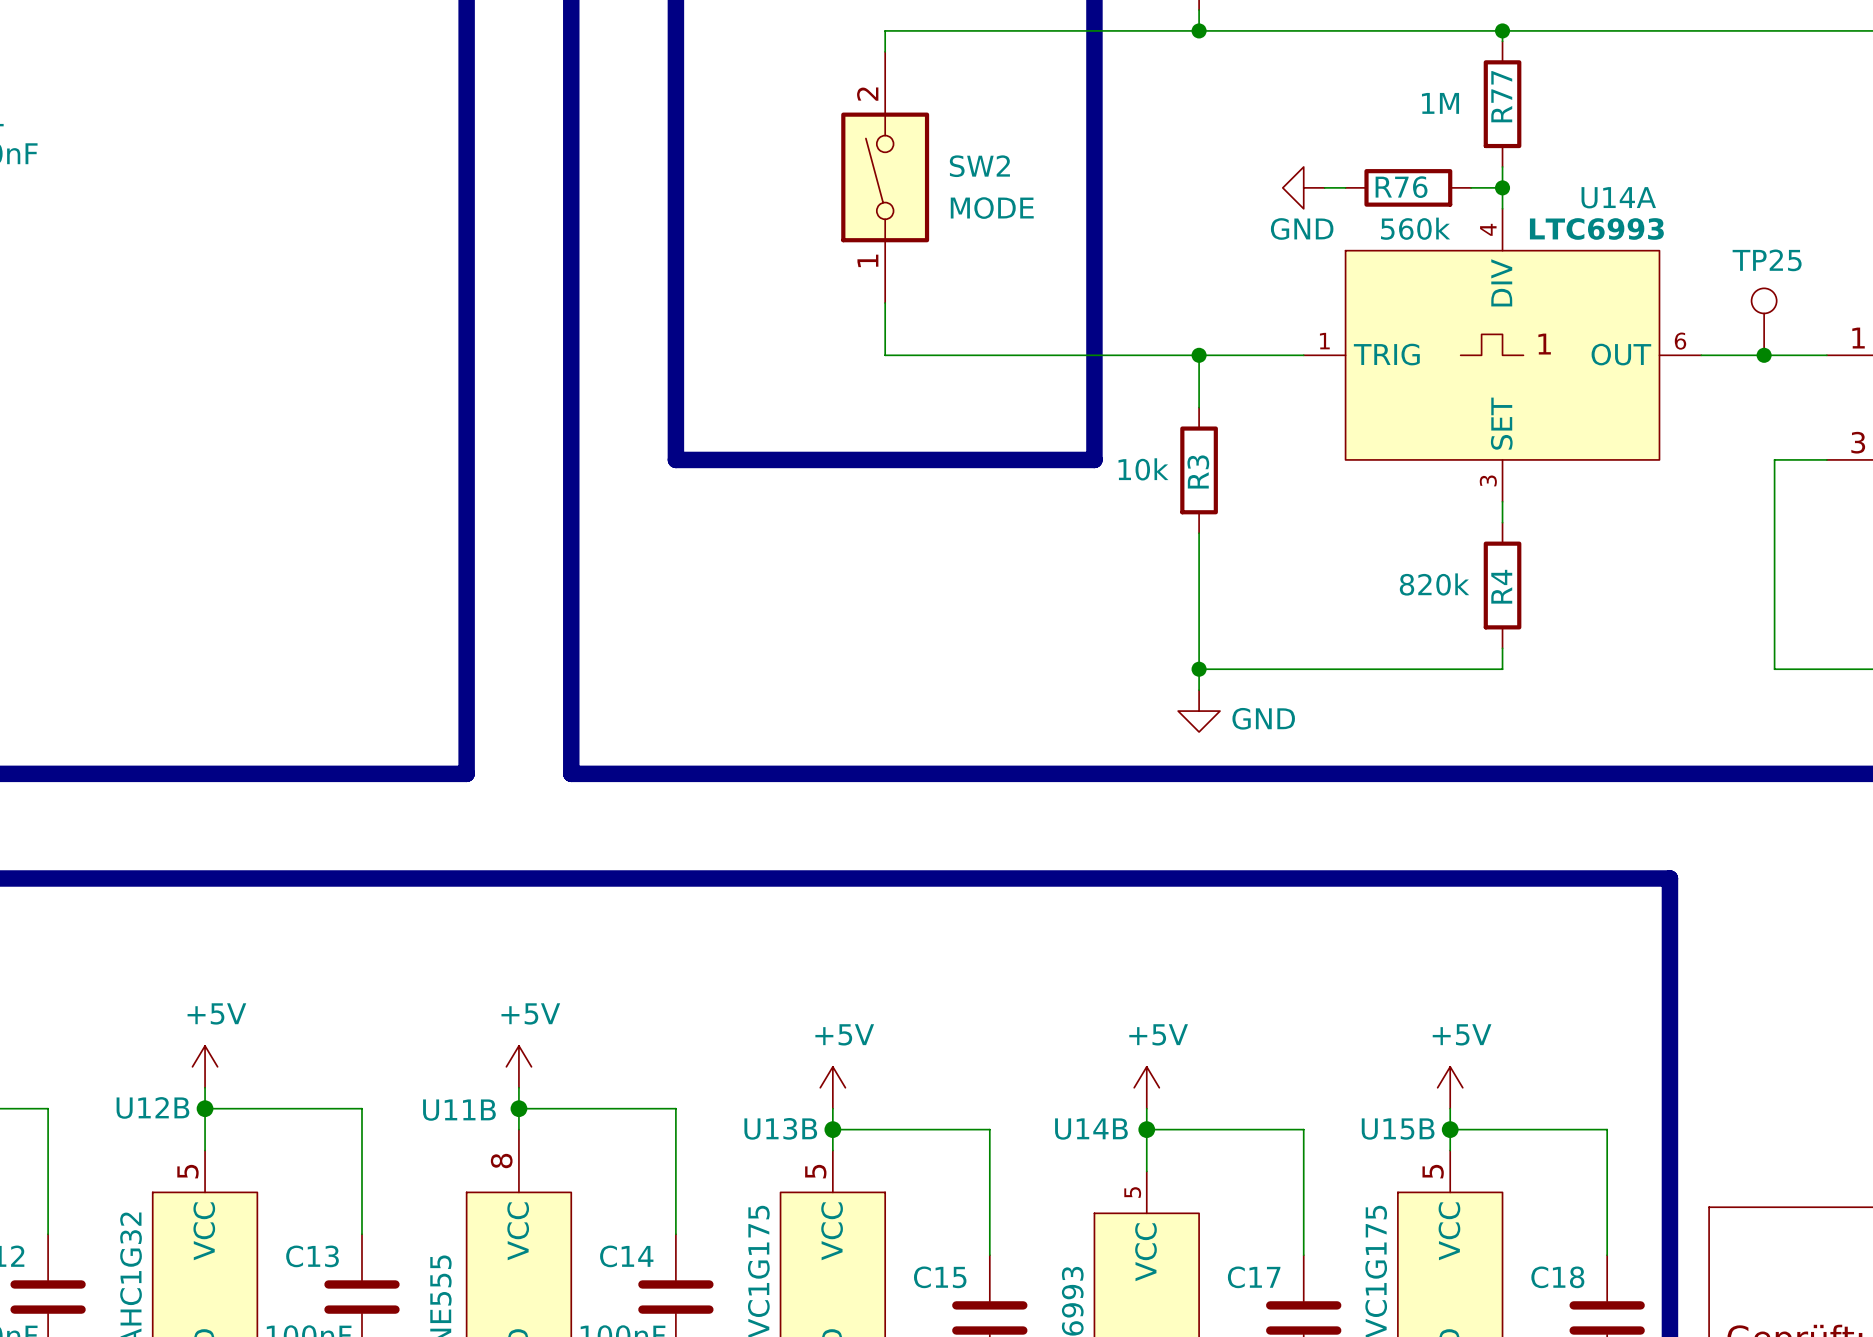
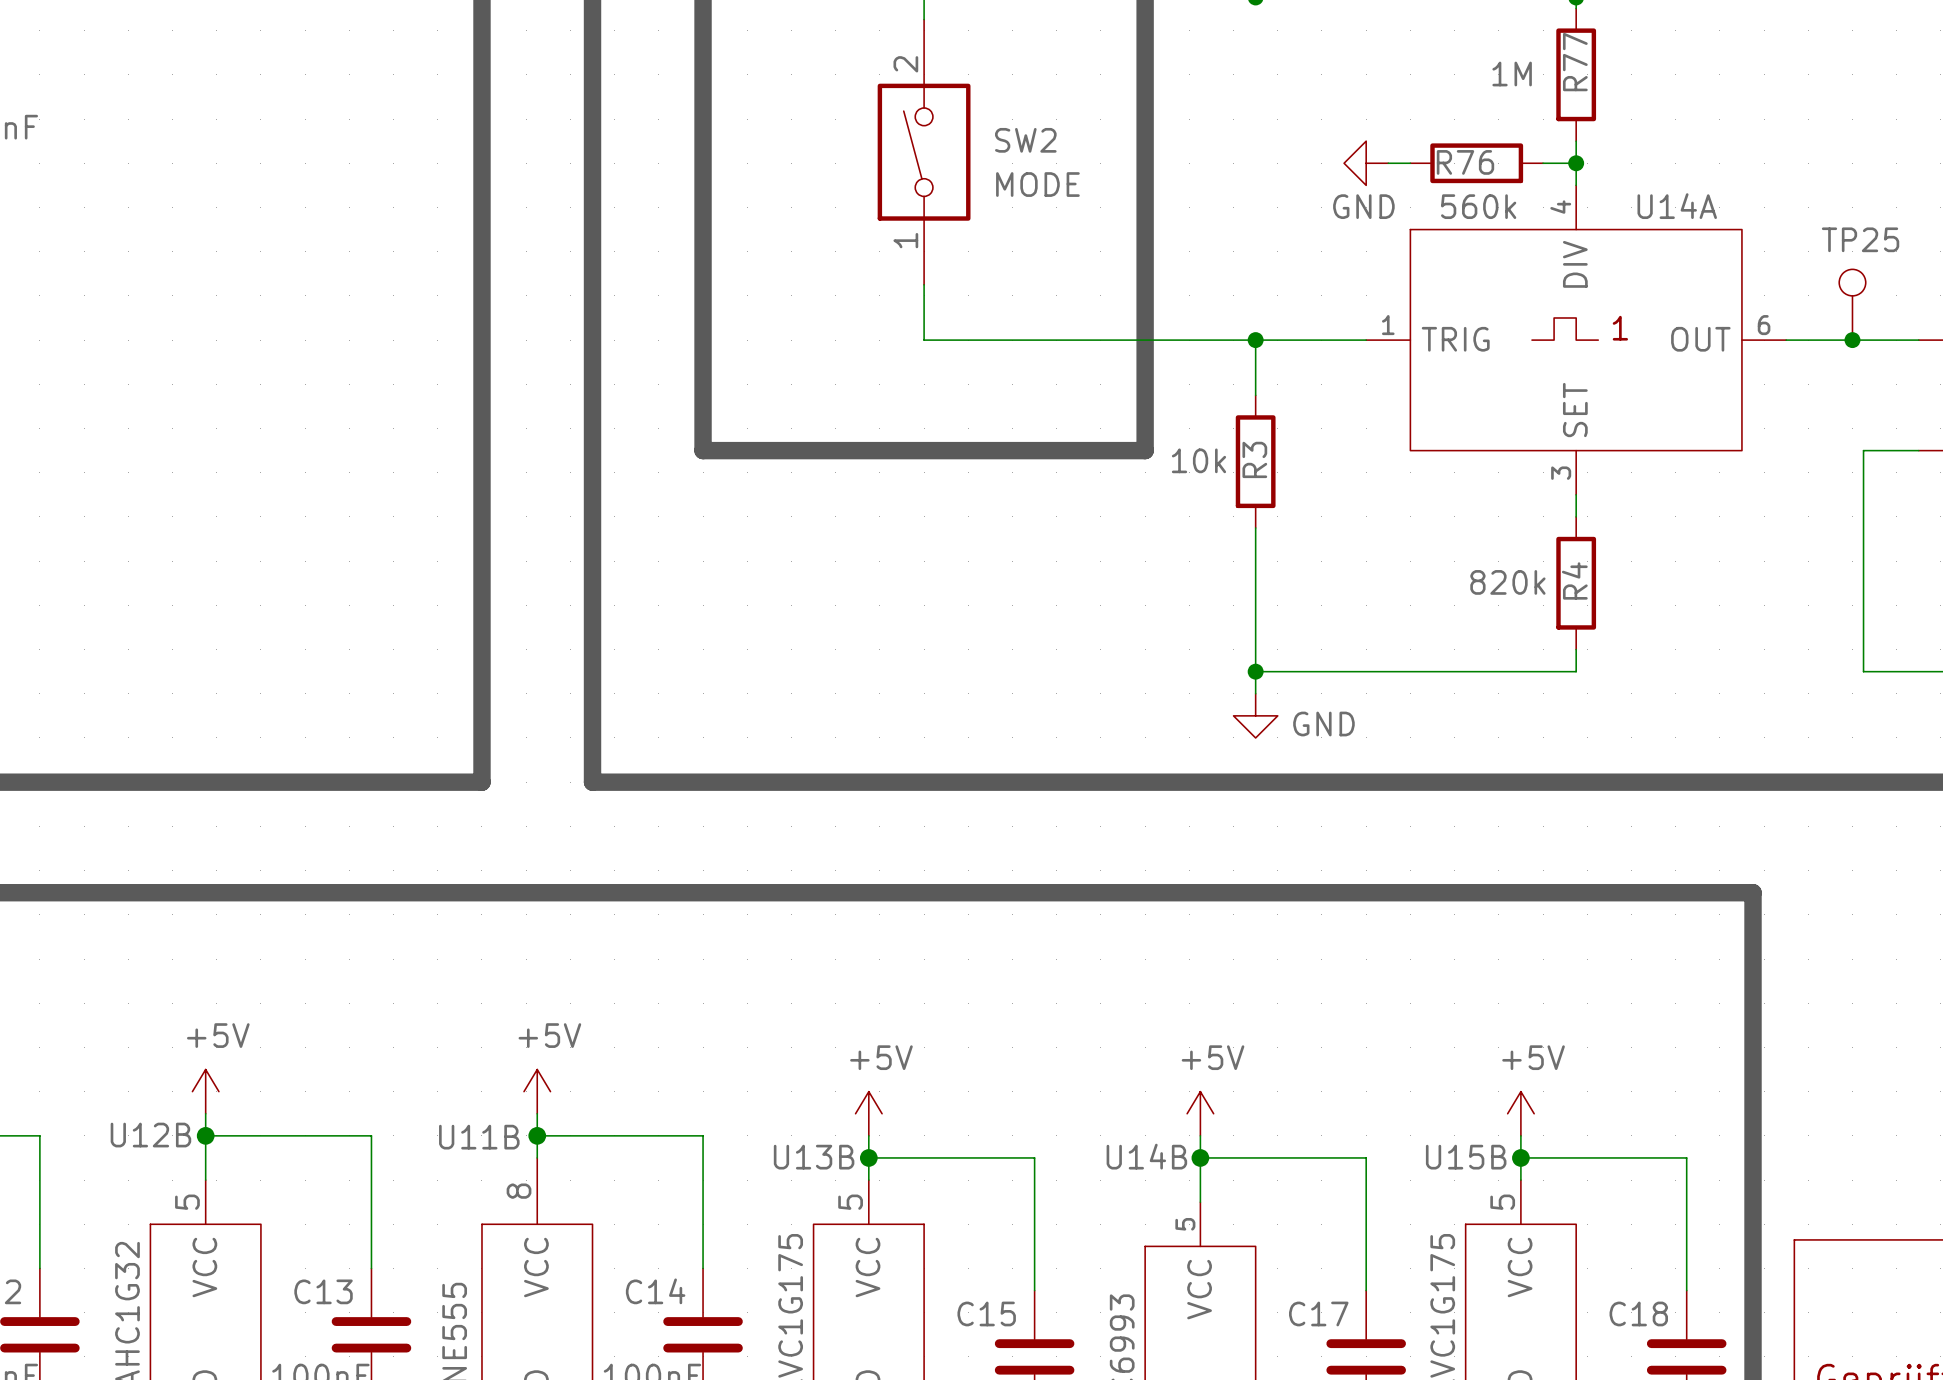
U14A name position: U14A (1618, 197) -> U14A (1677, 206)
U14A value: LTC6993 (1596, 228) -> none

